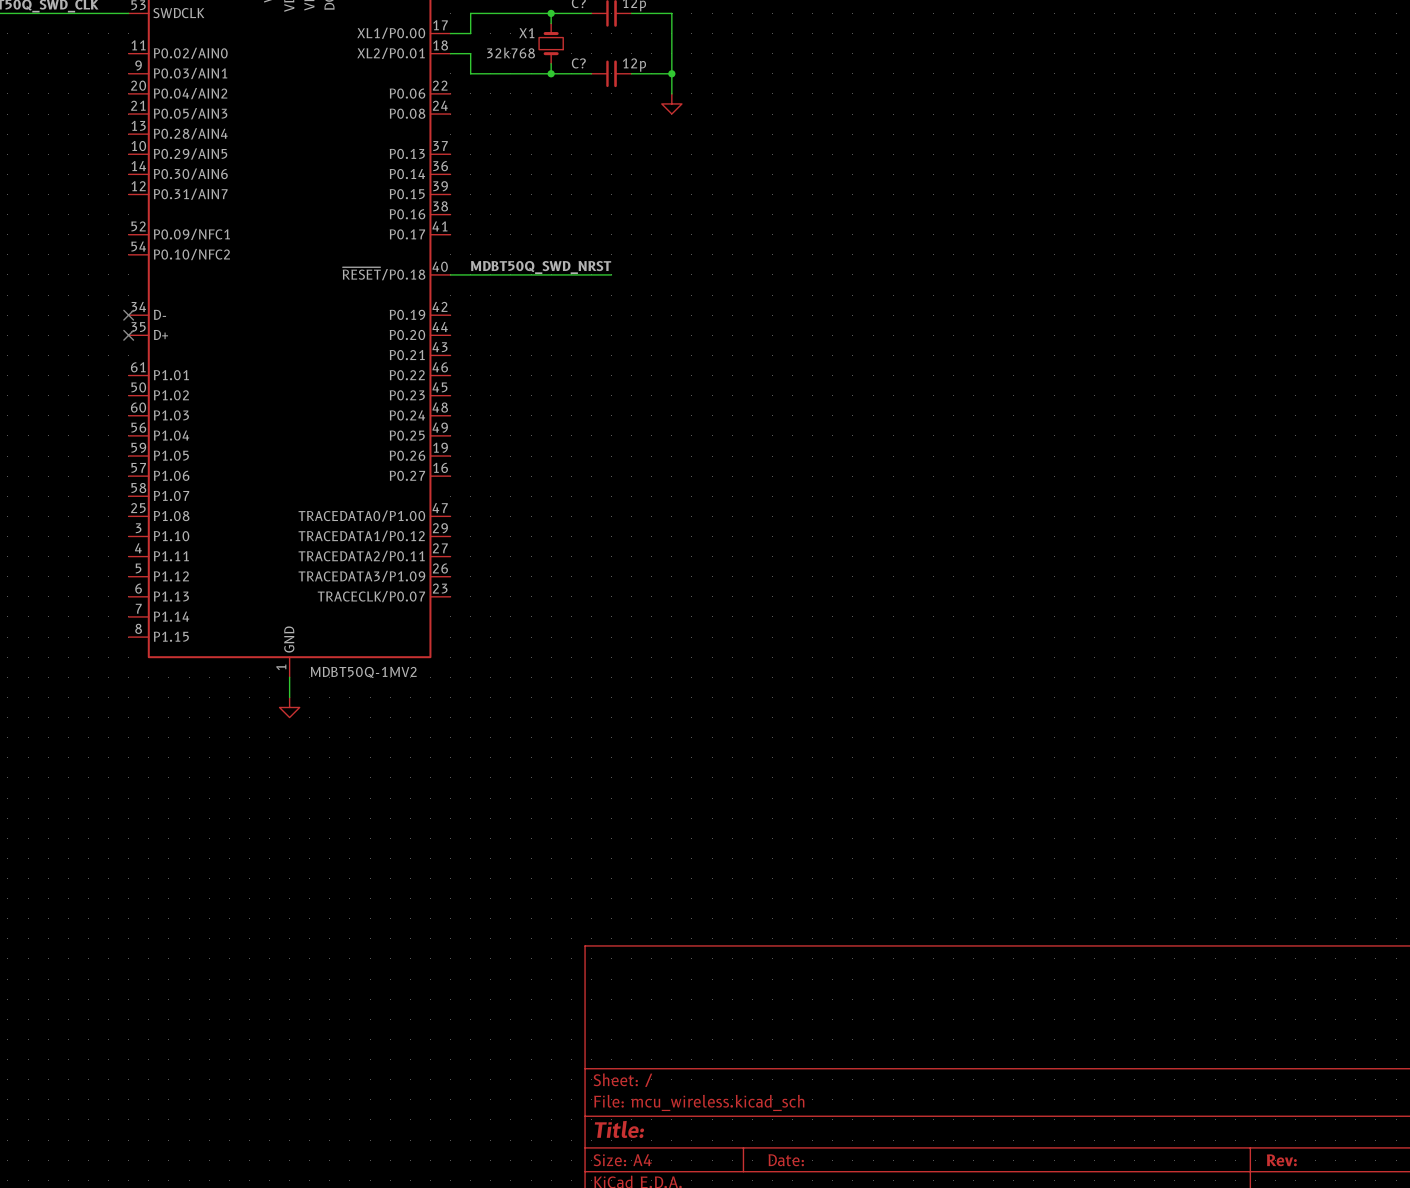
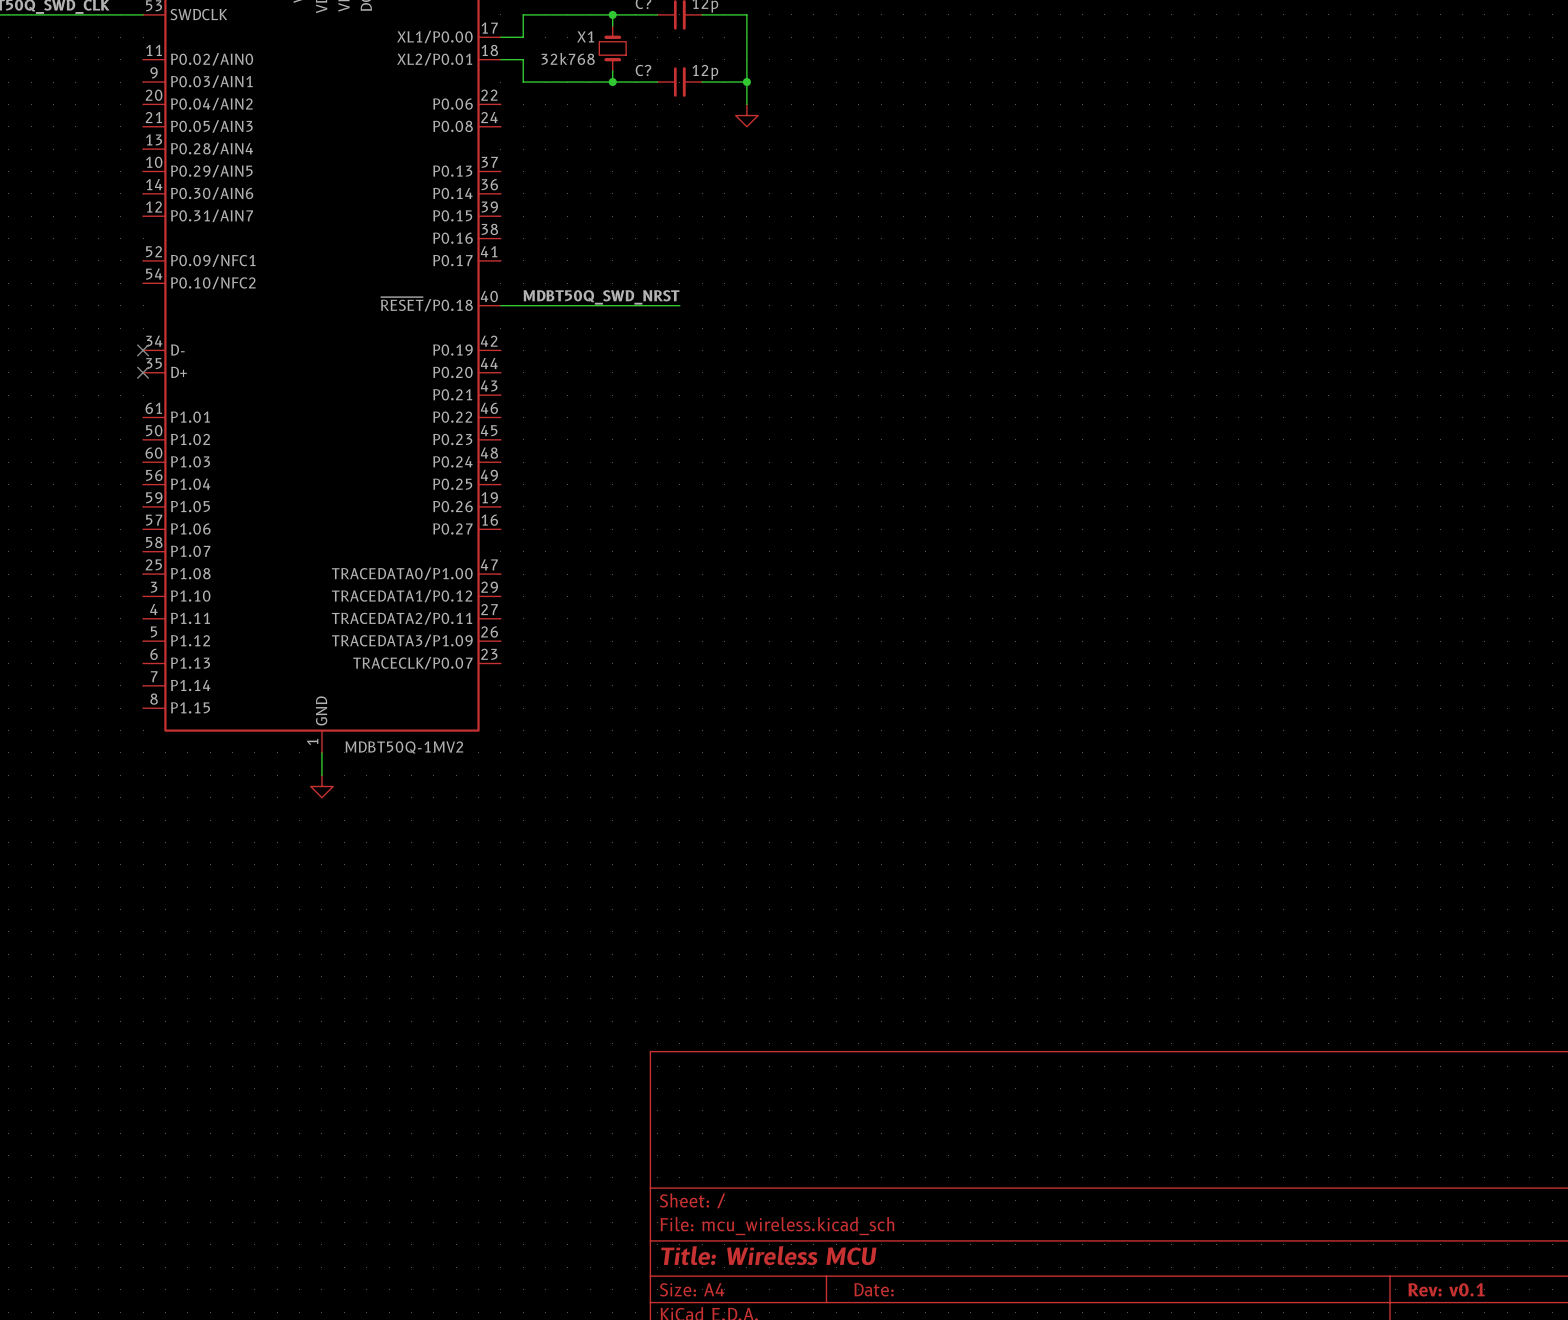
title block: Title: (619, 1129) -> Title: Wireless MCU (768, 1255)
title block: Rev: (1281, 1160) -> Rev: v0.1 (1446, 1289)

